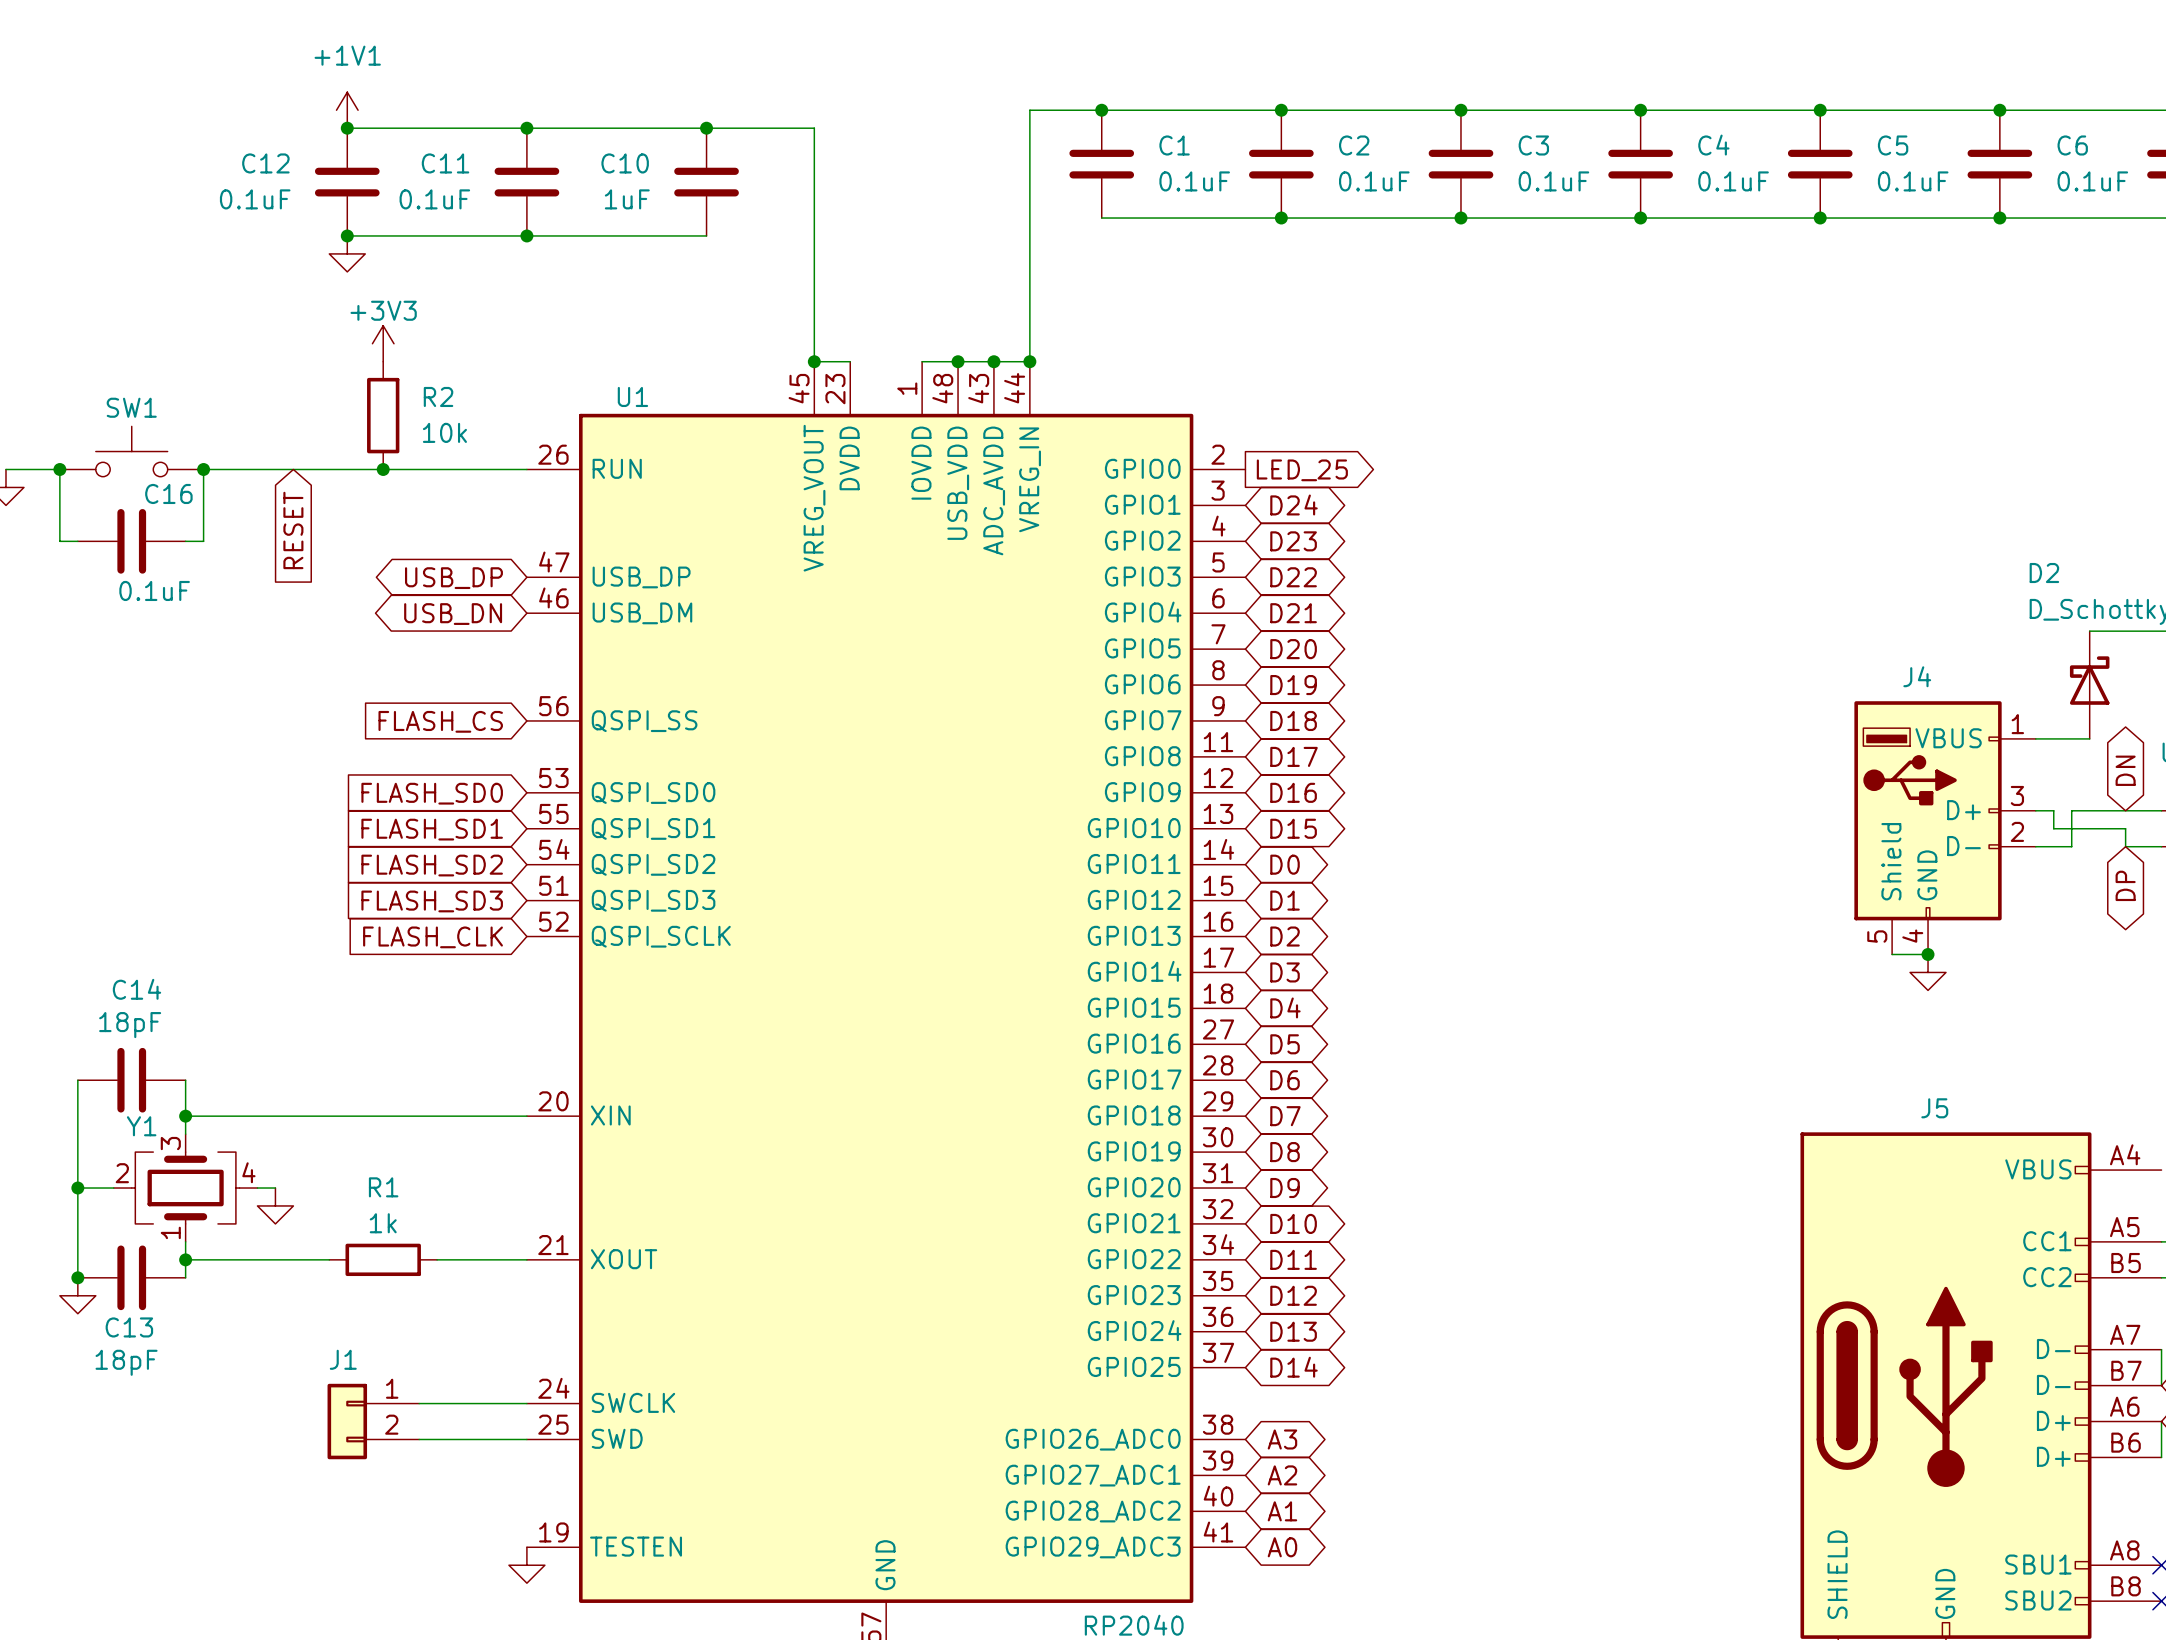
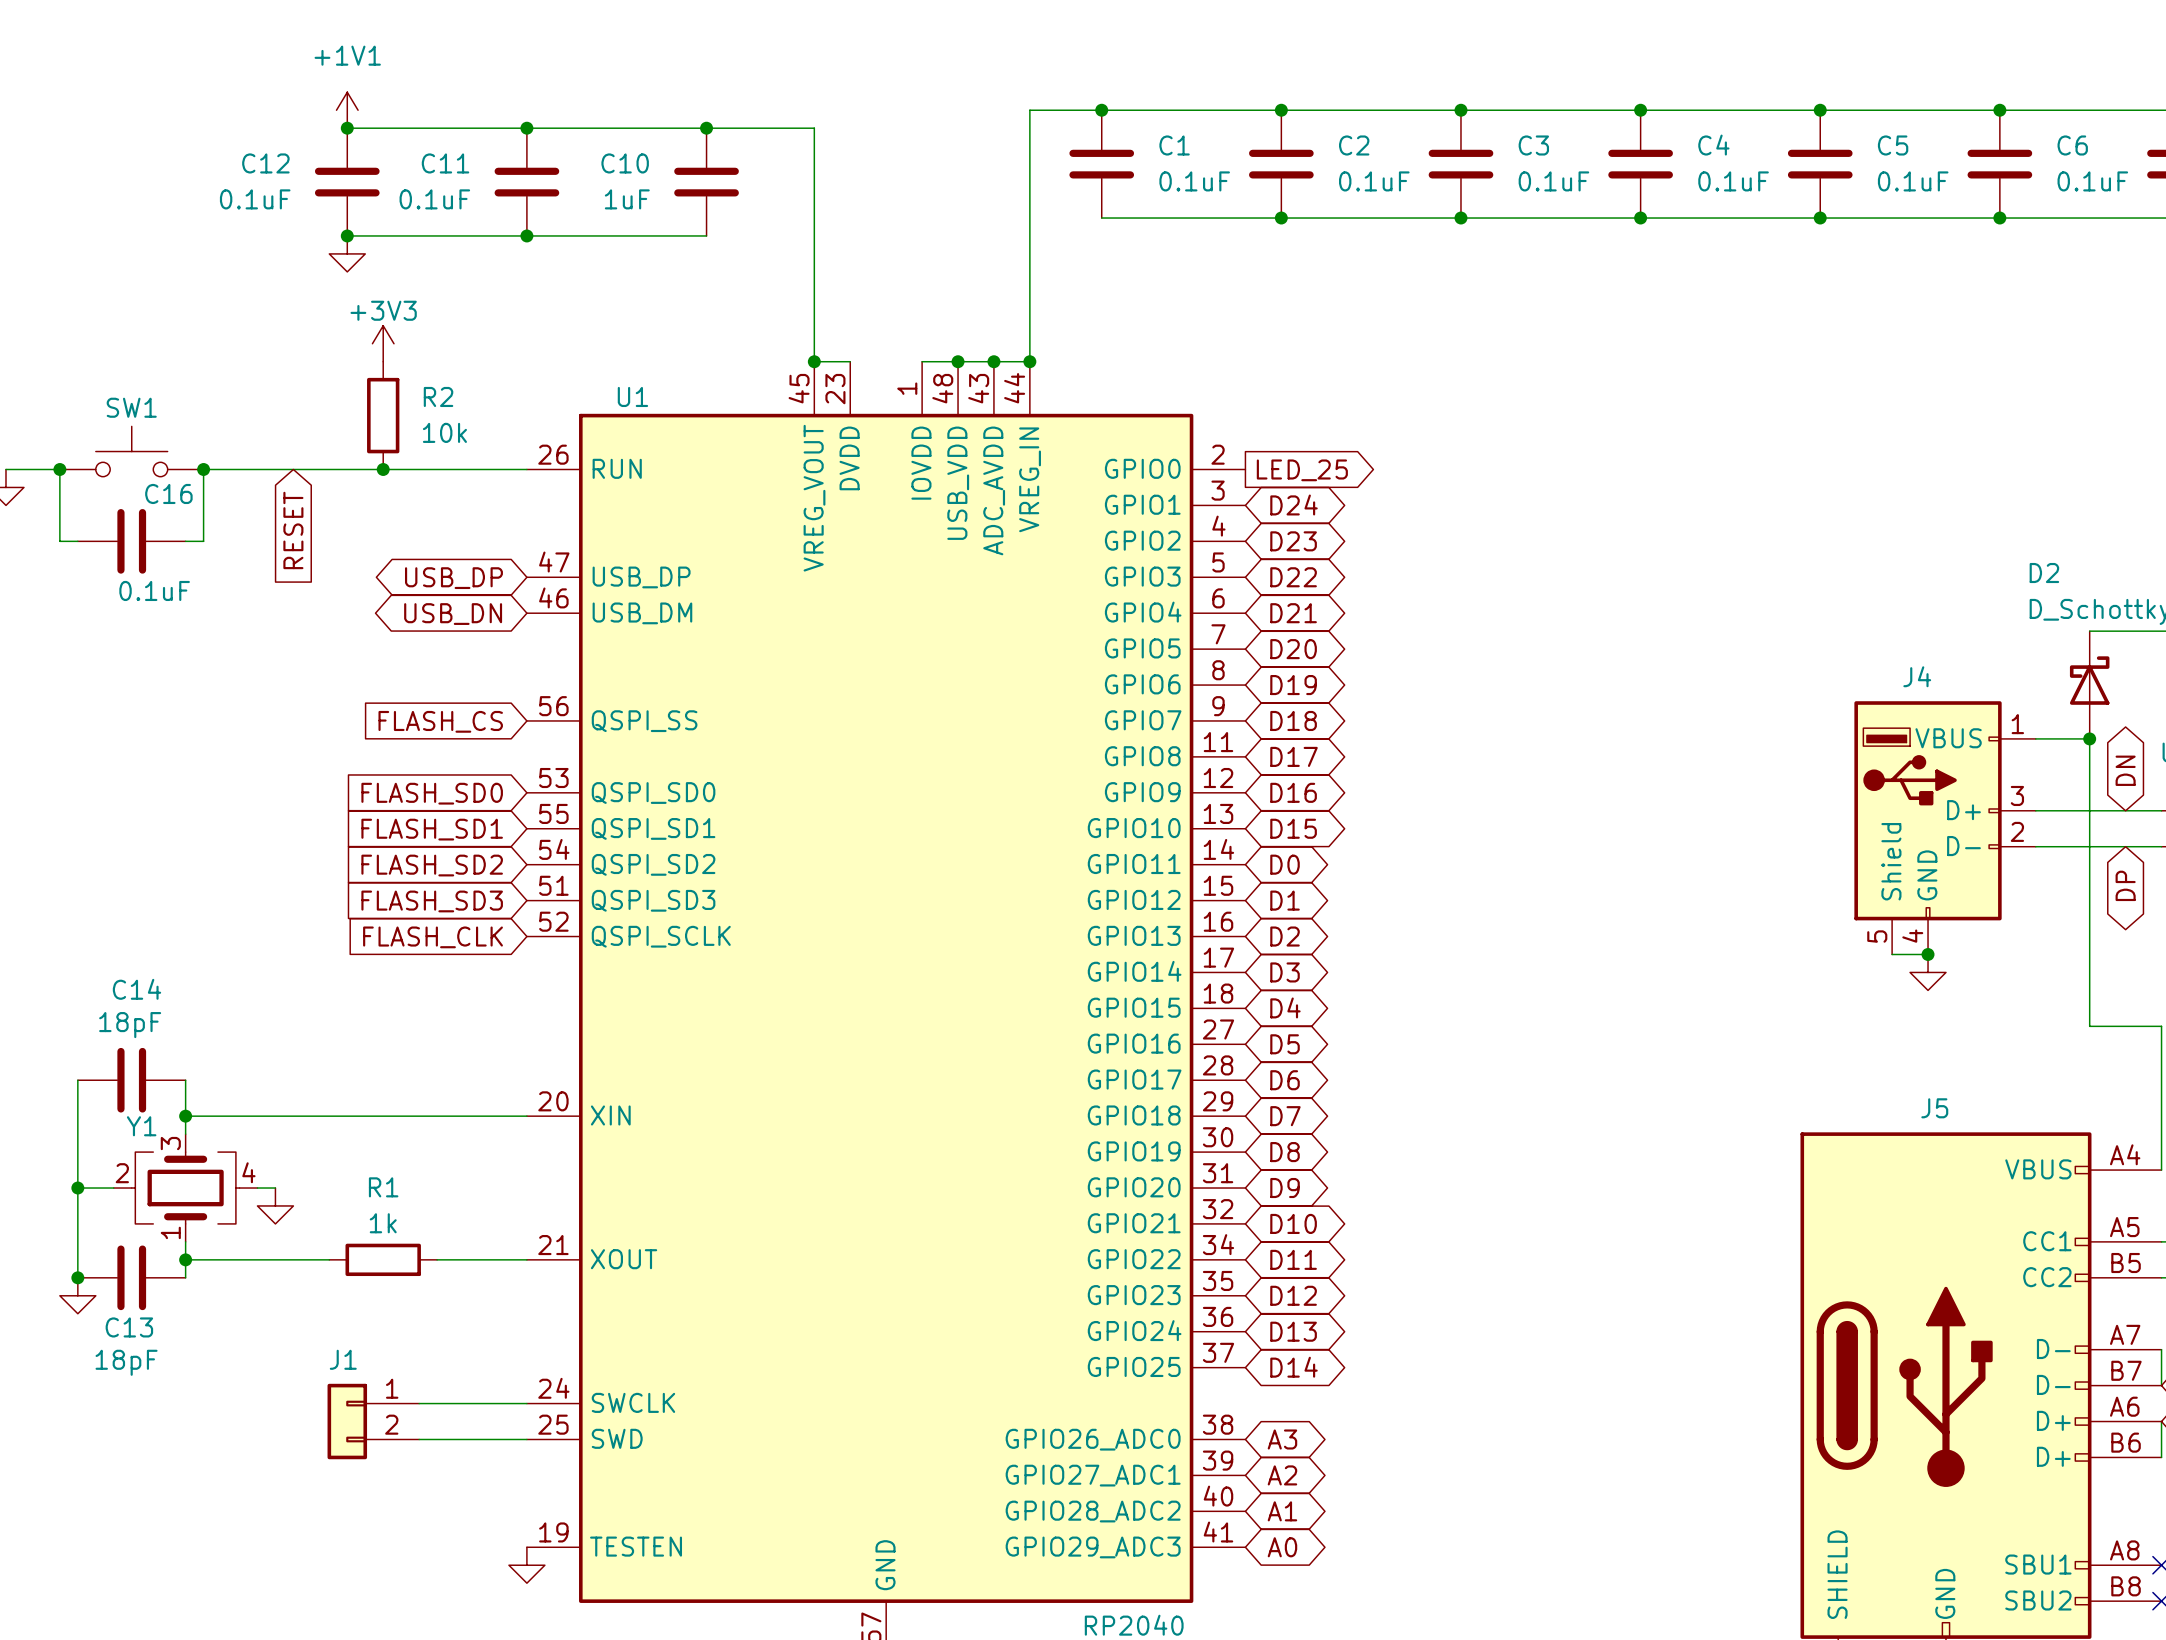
wire: none -> (2089, 738) (2089, 1026) (2161, 1026) (2161, 1170)
junction: none -> (2089, 738)
wire: (2053, 810) (2053, 828) (2125, 828) (2125, 846) -> (2071, 846) (2125, 846)
wire: (2071, 810) (2071, 846) -> (2071, 810) (2053, 810)

